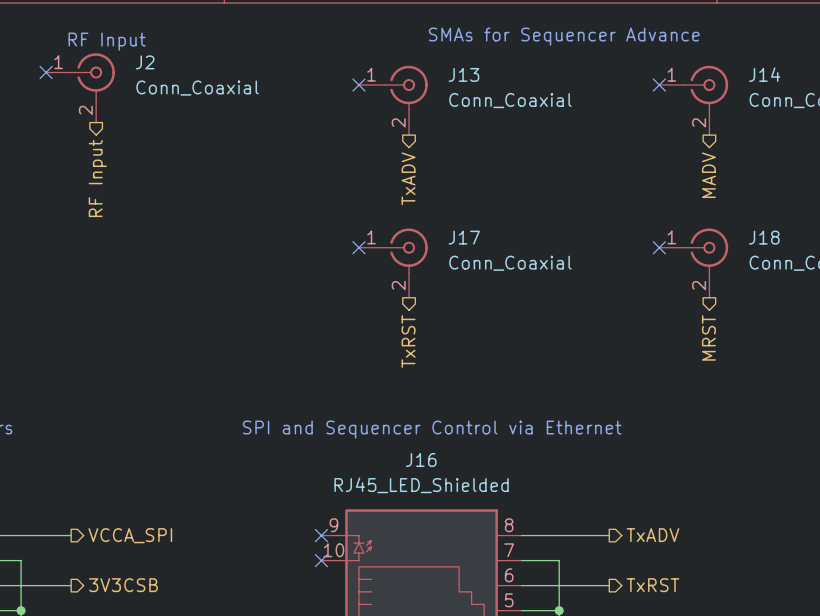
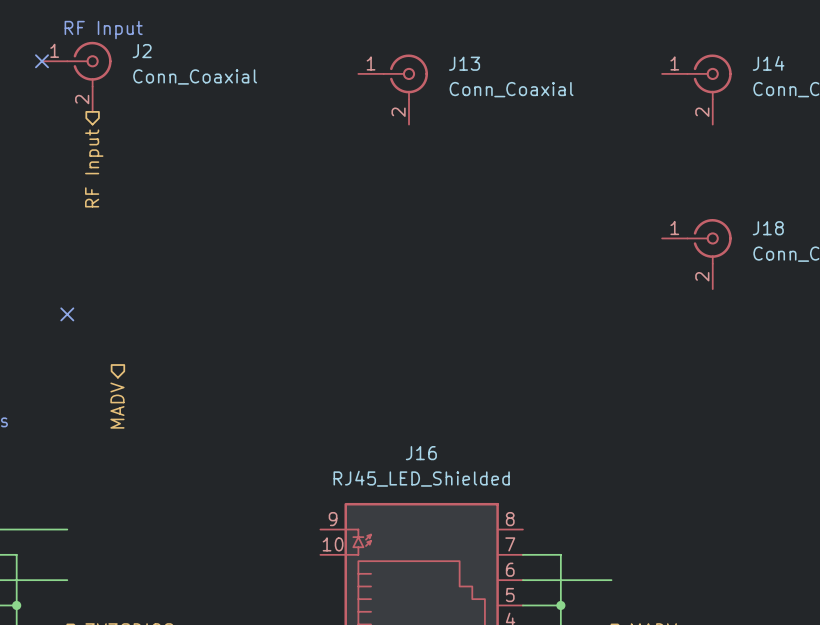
text: SMAs for Sequencer Advance (564, 36) -> none
no-connect mark: (358, 85) -> none
no-connect mark: (659, 85) -> none
hierarchical label: MADV (708, 175) -> none
hierarchical label: TxADV (408, 178) -> none
no-connect mark: (358, 247) -> none
no-connect mark: (659, 247) -> none
J17: Conn_Coaxial (393, 263) -> none
no-connect mark: none -> (67, 314)
hierarchical label: MRST (708, 337) -> none
hierarchical label: TxRST (408, 341) -> none
hierarchical label: none -> MADV (117, 405)
text: SPI and Sequencer Control via Ethernet (432, 429) -> none
hierarchical label: VCCA_SPI (130, 535) -> none
no-connect mark: (321, 535) -> none
wire: (521, 535) (609, 535) -> none
hierarchical label: TxADV (652, 535) -> none
no-connect mark: (321, 560) -> none
hierarchical label: 3V3CSB (123, 585) -> none
hierarchical label: TxRST (652, 585) -> none

